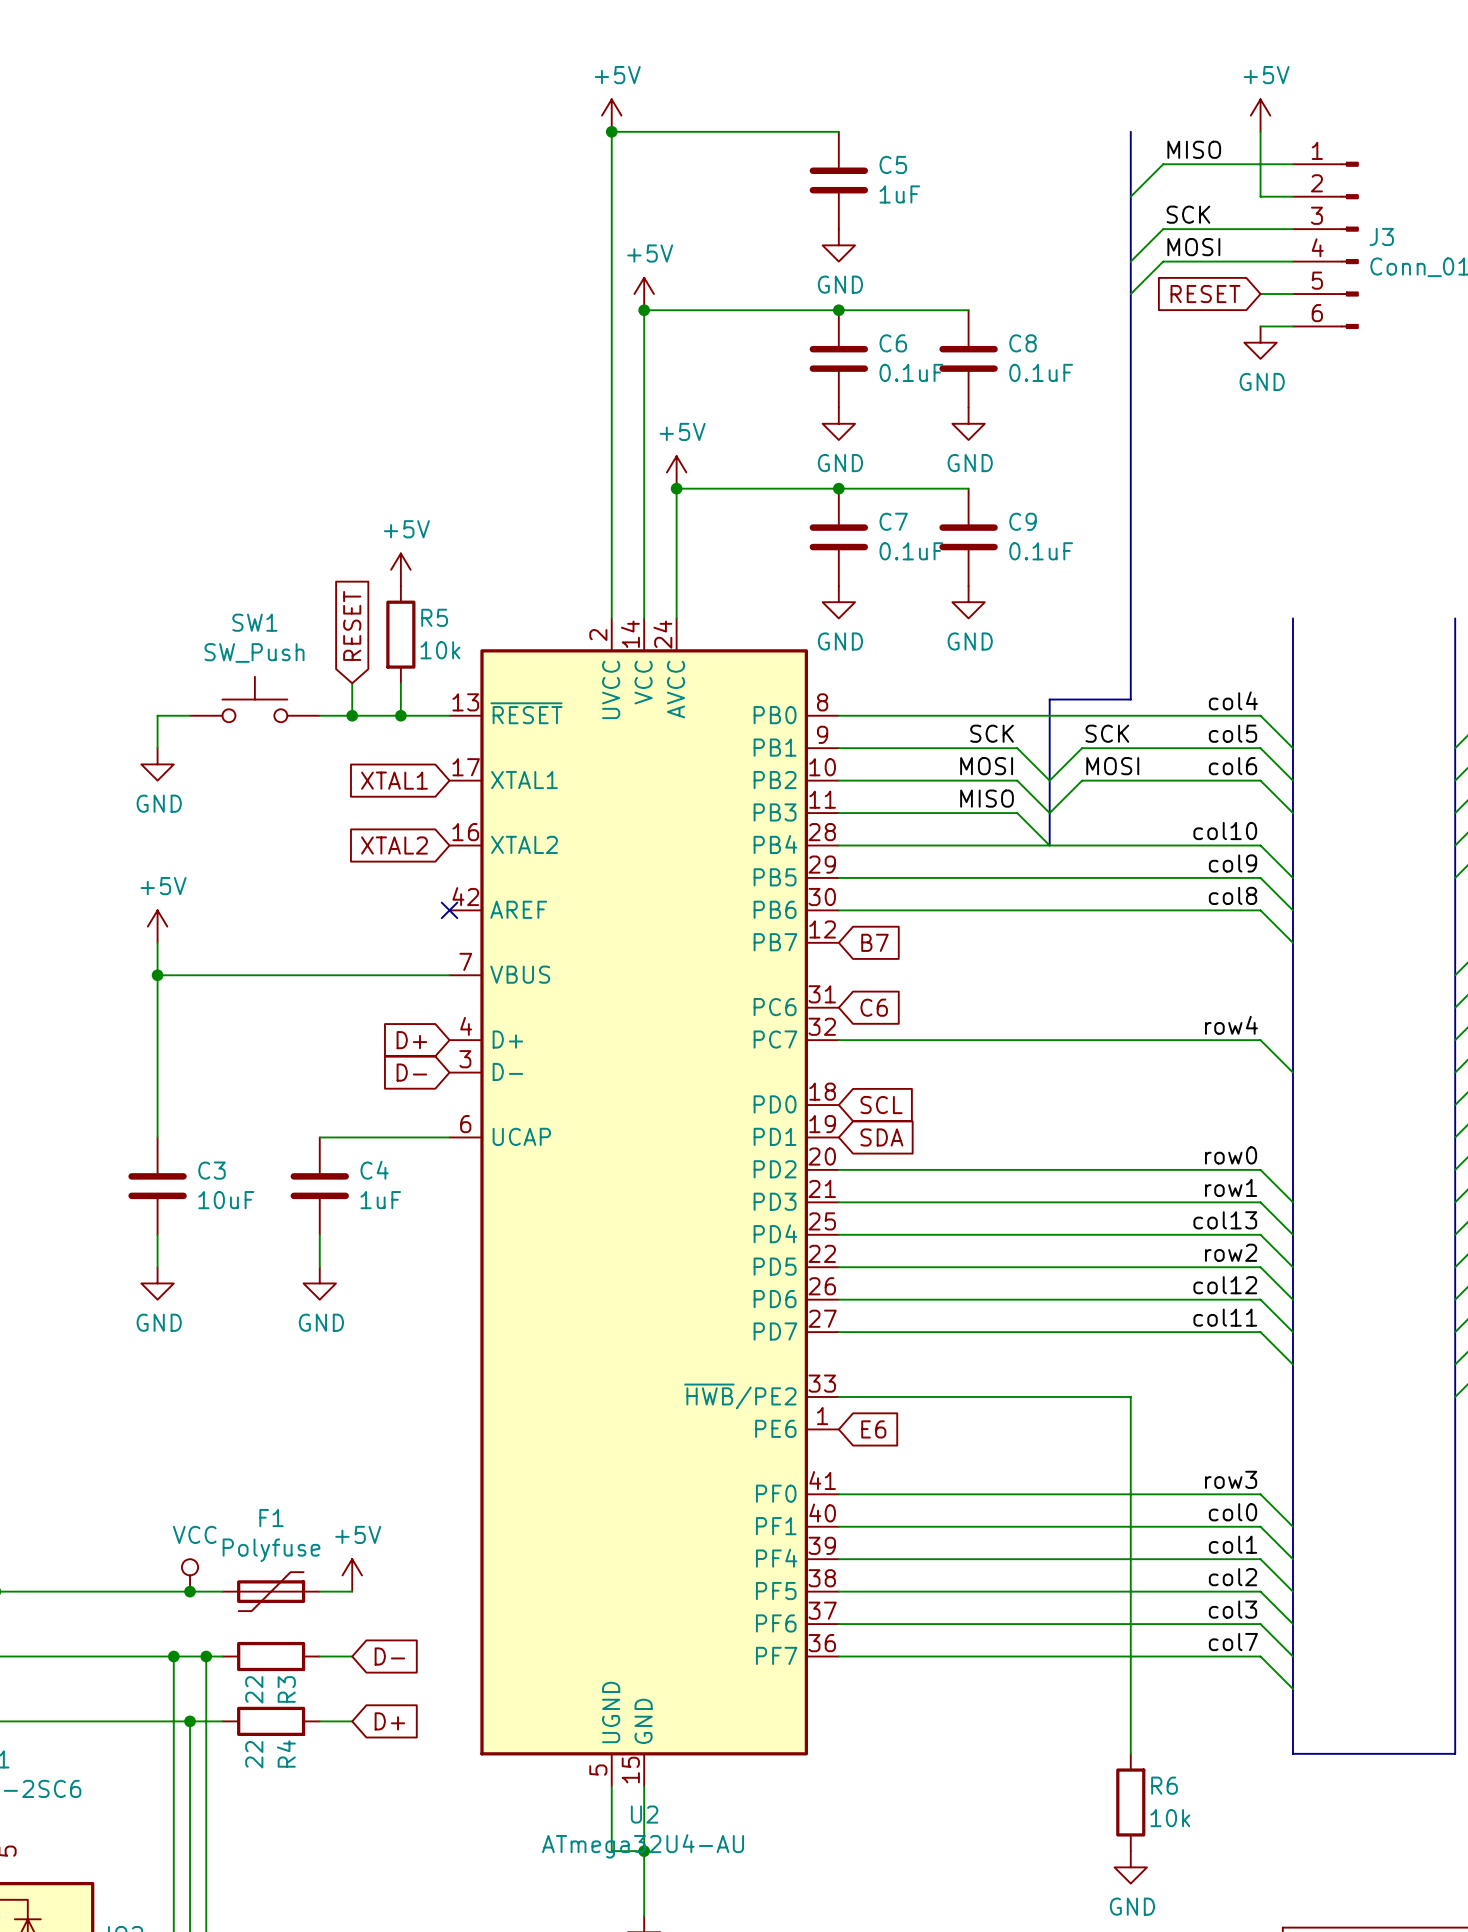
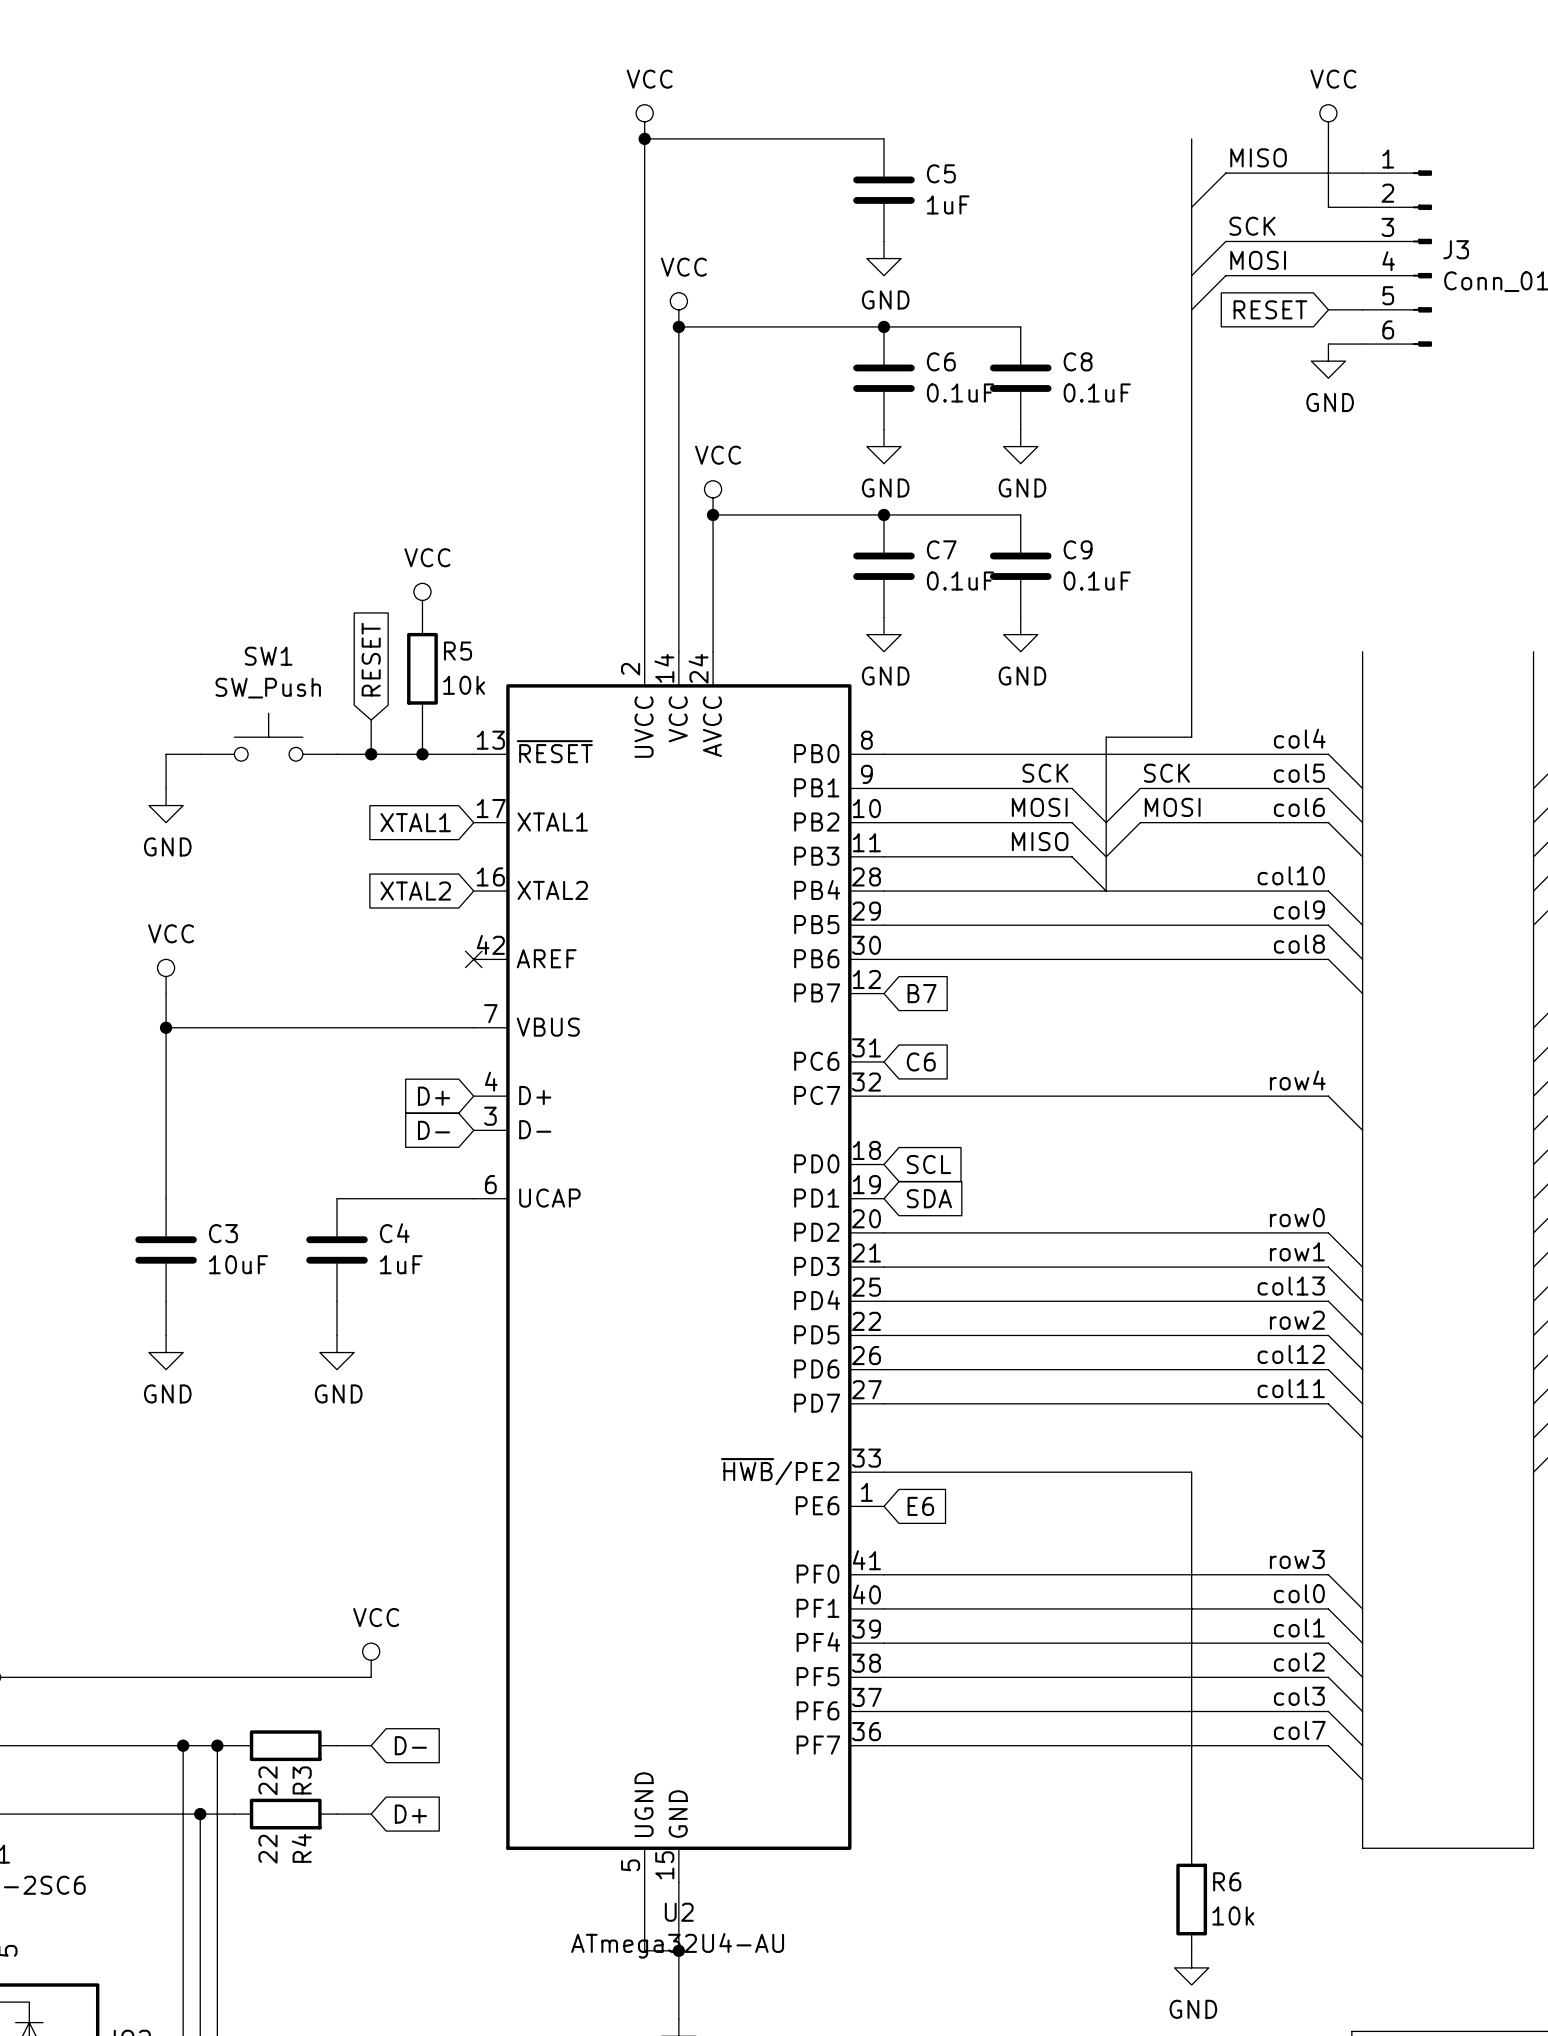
power symbol: +5V (611, 115) -> VCC (644, 121)
power symbol: +5V (1260, 115) -> VCC (1328, 121)
power symbol: +5V (644, 294) -> VCC (678, 309)
power symbol: +5V (676, 472) -> VCC (713, 497)
power symbol: +5V (400, 569) -> VCC (422, 600)
power symbol: +5V (157, 926) -> VCC (166, 976)
power symbol: VCC (190, 1575) -> none
power symbol: +5V (352, 1575) -> VCC (371, 1660)
junction: (190, 1591) -> none
F1: Polyfuse (271, 1591) -> none

